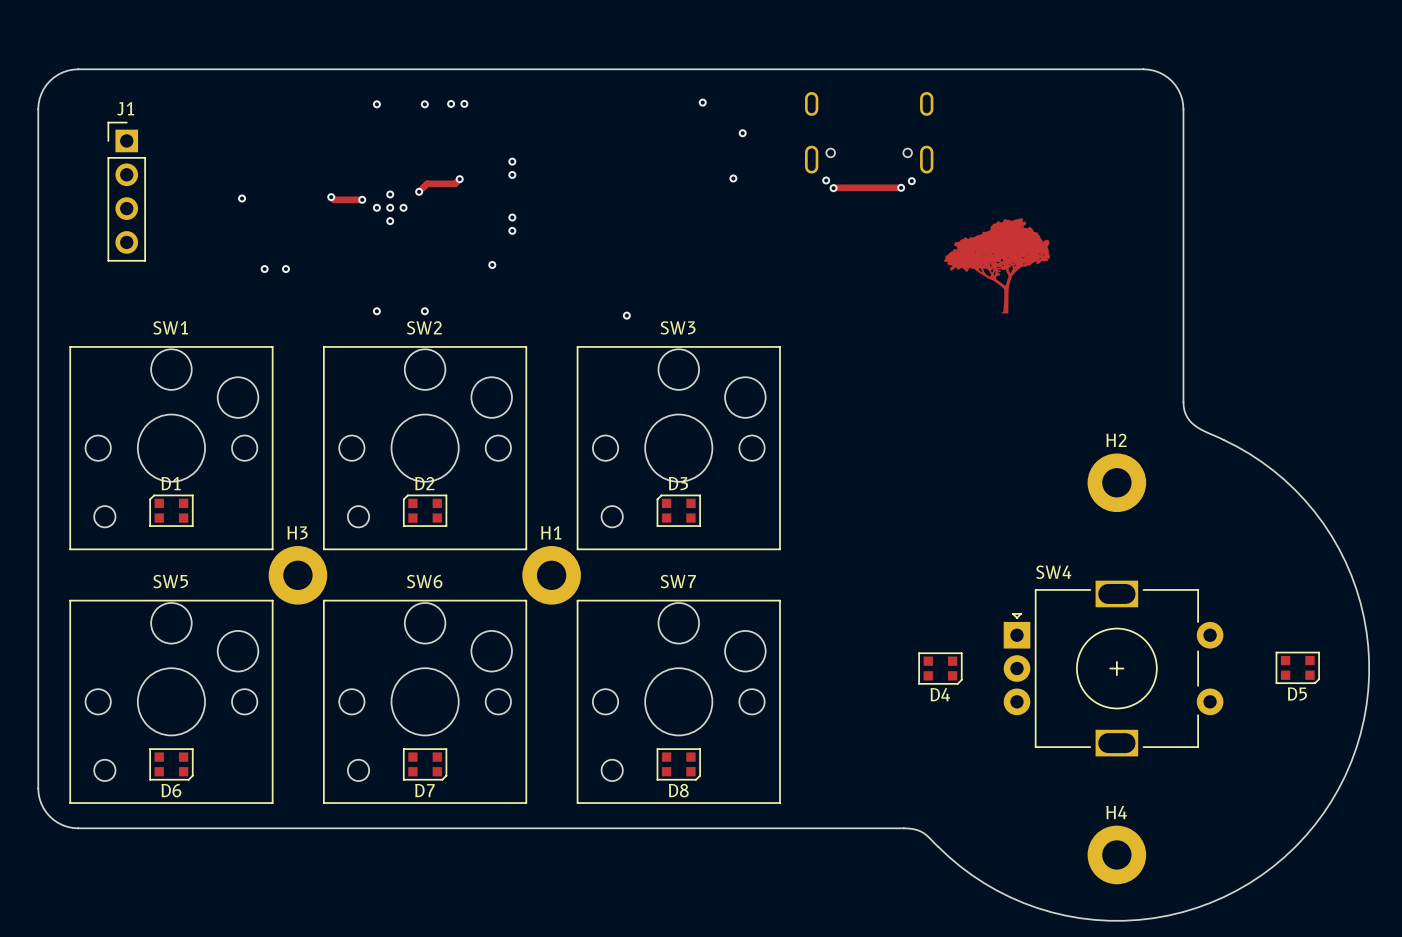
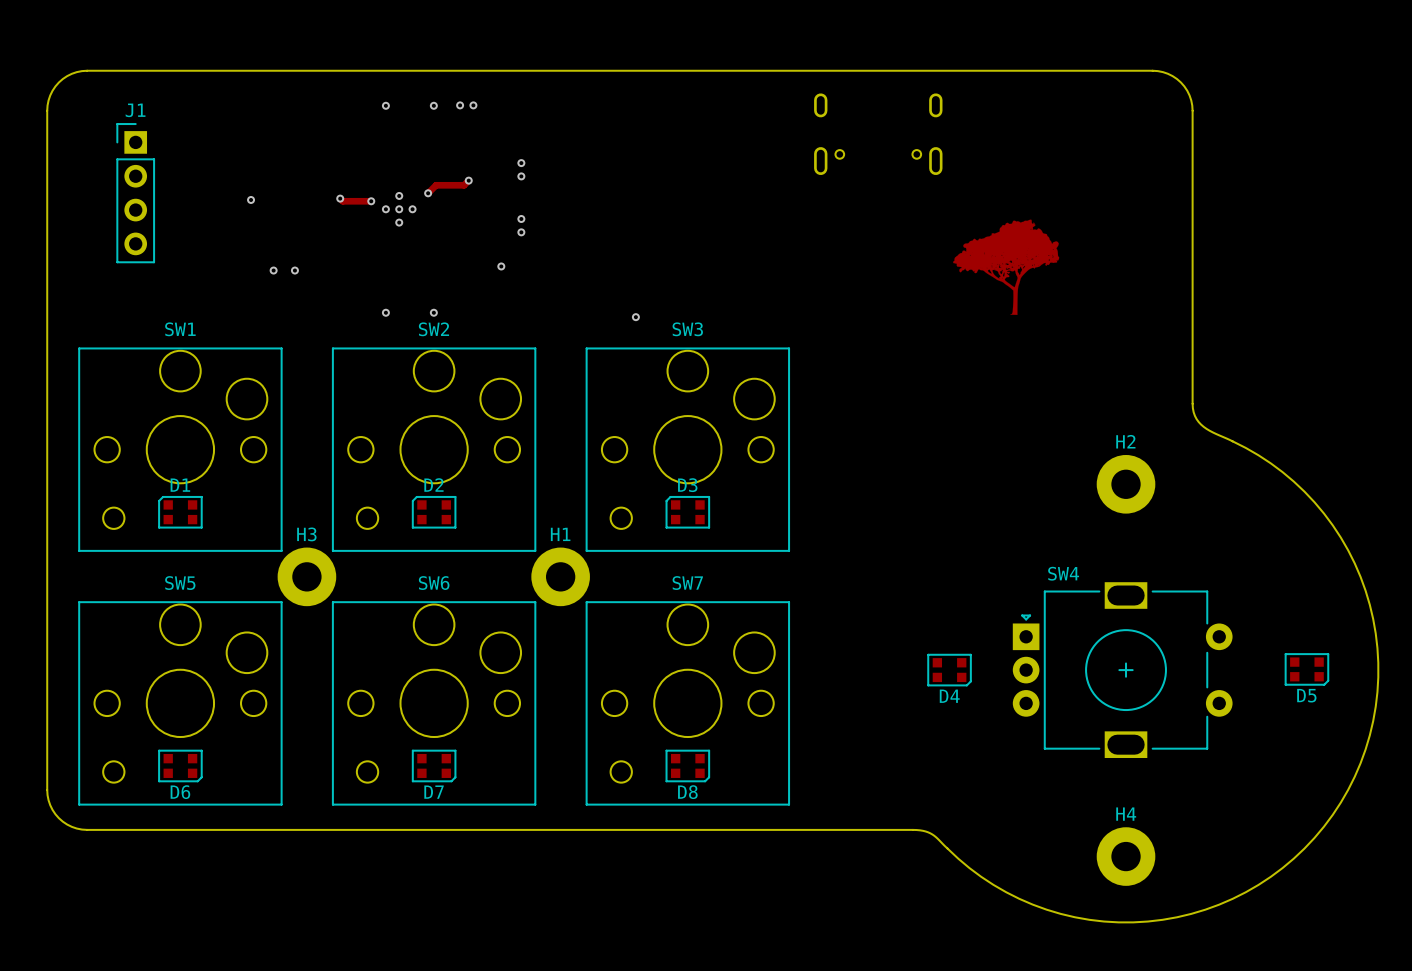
via: (702, 102) -> none
via: (742, 133) -> none
via: (733, 178) -> none
via: (826, 180) -> none
via: (911, 181) -> none
track: (901, 187) (833, 188) -> none
via: (901, 187) -> none
via: (833, 188) -> none

